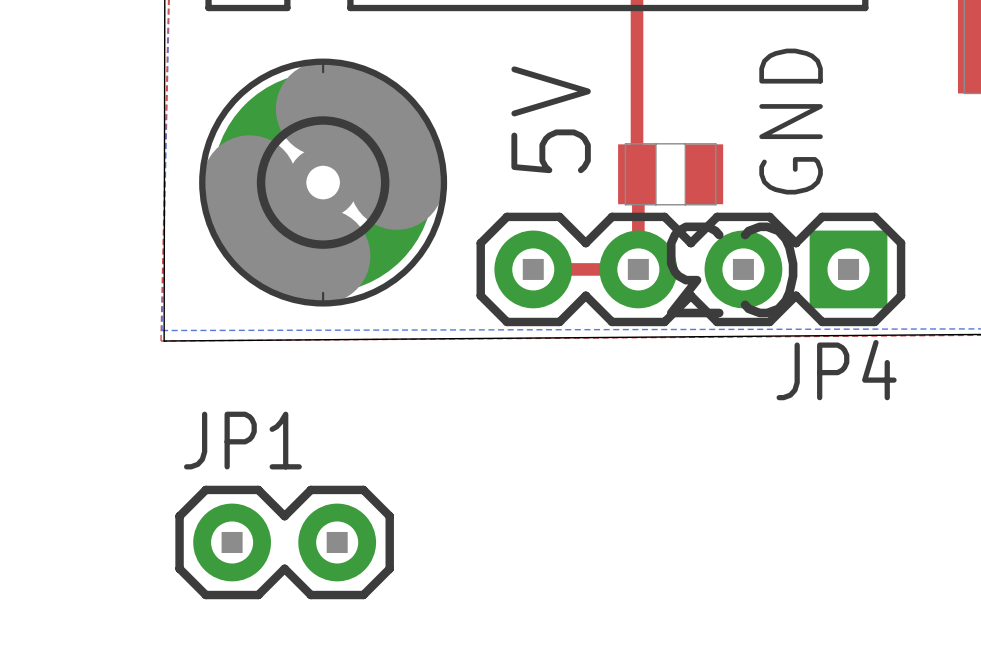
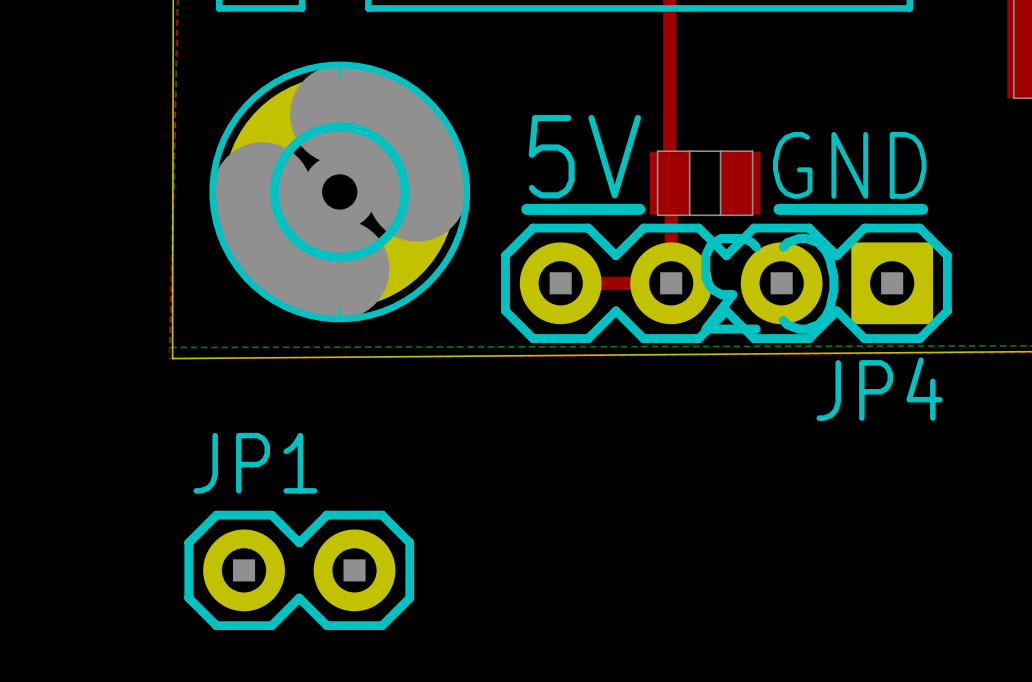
text rotation: 0° (551, 119) -> 90° clockwise (584, 156)
text rotation: 0° (791, 121) -> 90° clockwise (849, 165)
line: none -> (526, 209) (639, 209)
line: none -> (779, 209) (922, 209)

